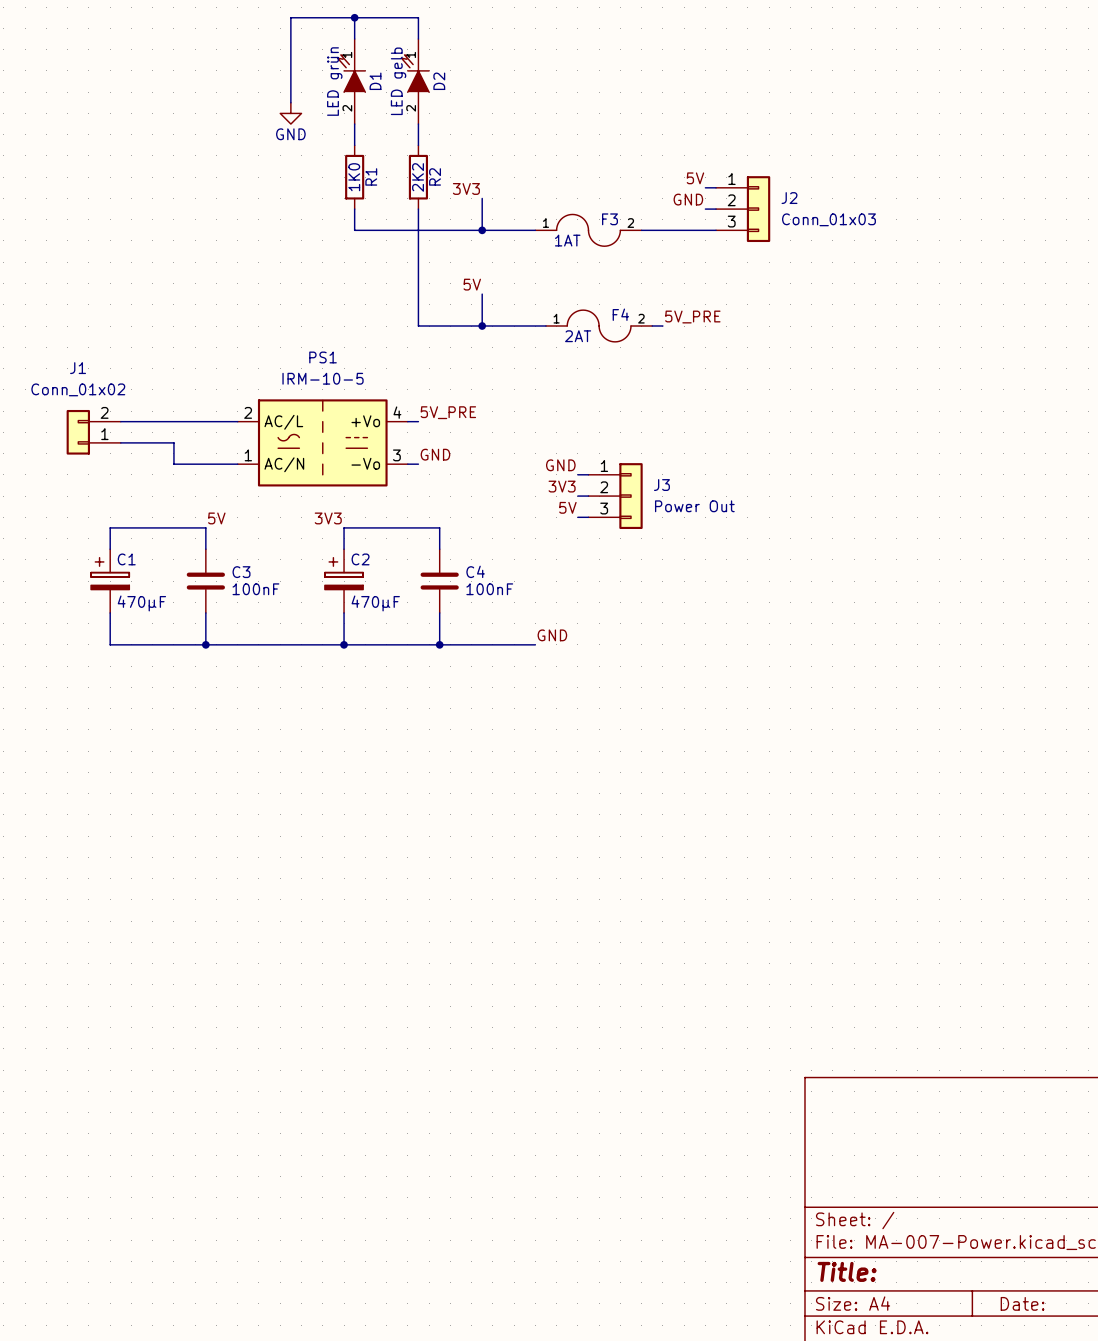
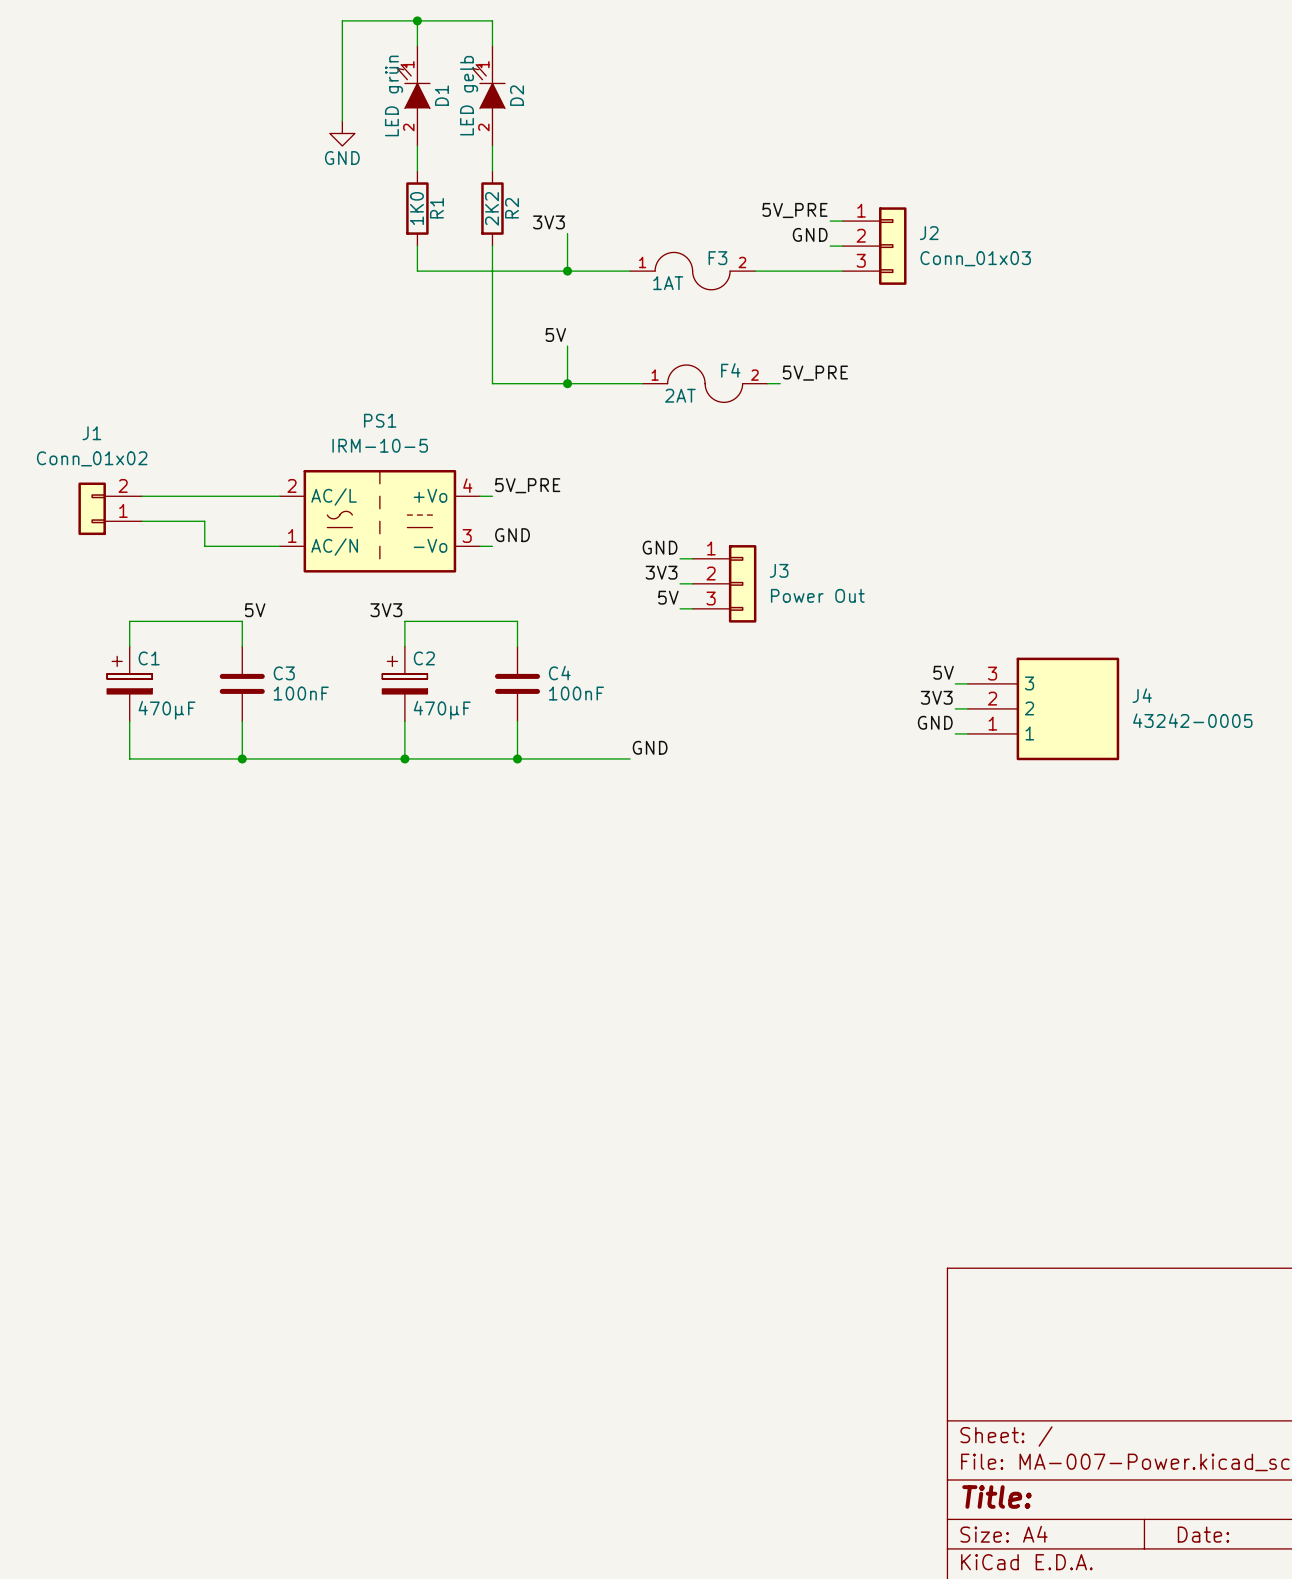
label: 5V (695, 178) -> 5V_PRE (794, 210)
label: none -> 5V (943, 672)
wire: none -> (955, 683) (967, 683)
label: none -> 3V3 (936, 697)
wire: none -> (955, 708) (967, 708)
J4: none -> 43242-0005 (1043, 708)
label: none -> GND (935, 722)
wire: none -> (955, 733) (967, 733)

